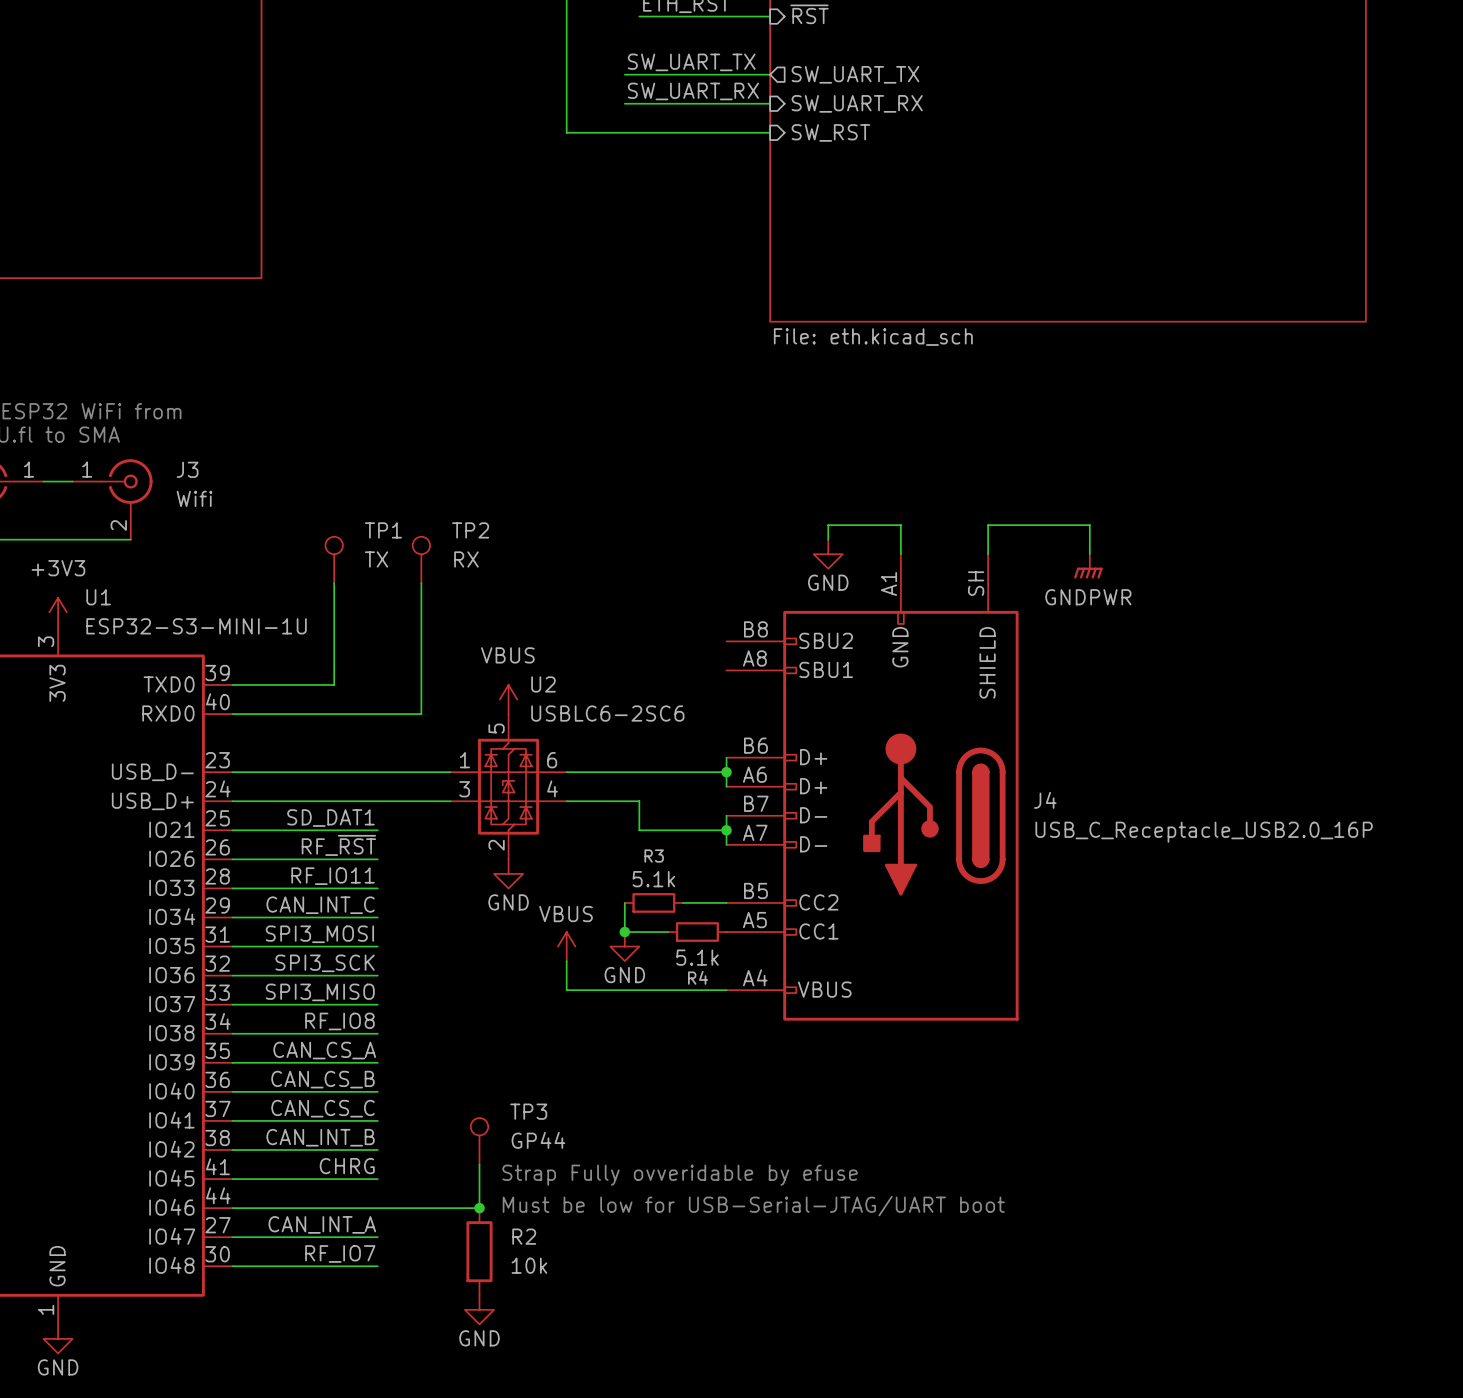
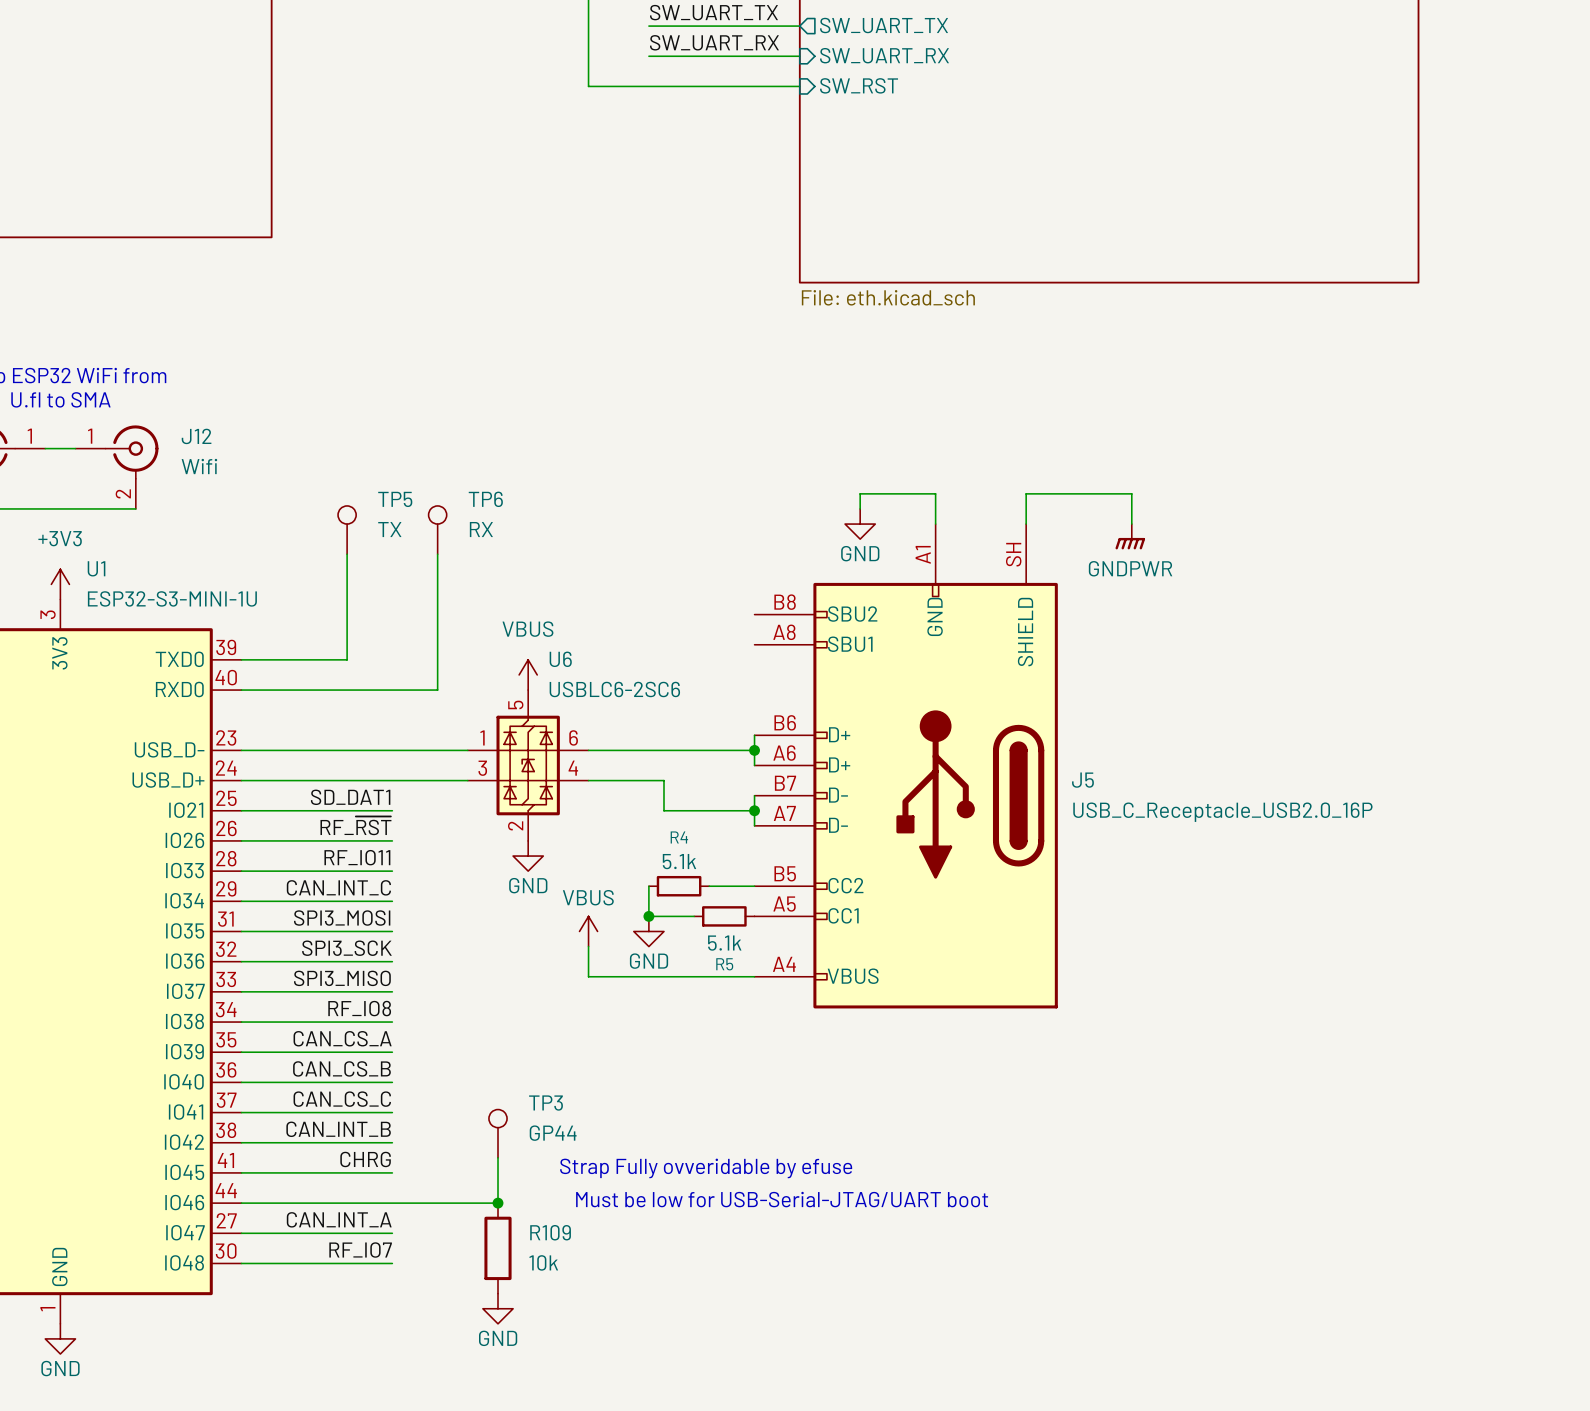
J3 name: J3 (187, 469) -> J12 (196, 436)
TP1 name: TP1 (383, 530) -> TP5 (395, 499)
TP2 name: TP2 (470, 530) -> TP6 (485, 499)
U2 name: U2 (543, 684) -> U6 (560, 659)
J4 name: J4 (1045, 800) -> J5 (1082, 780)
R3 name: R3 (654, 856) -> R4 (679, 837)
R4 name: R4 (698, 977) -> R5 (724, 964)
R2 name: R2 (524, 1236) -> R109 (550, 1232)

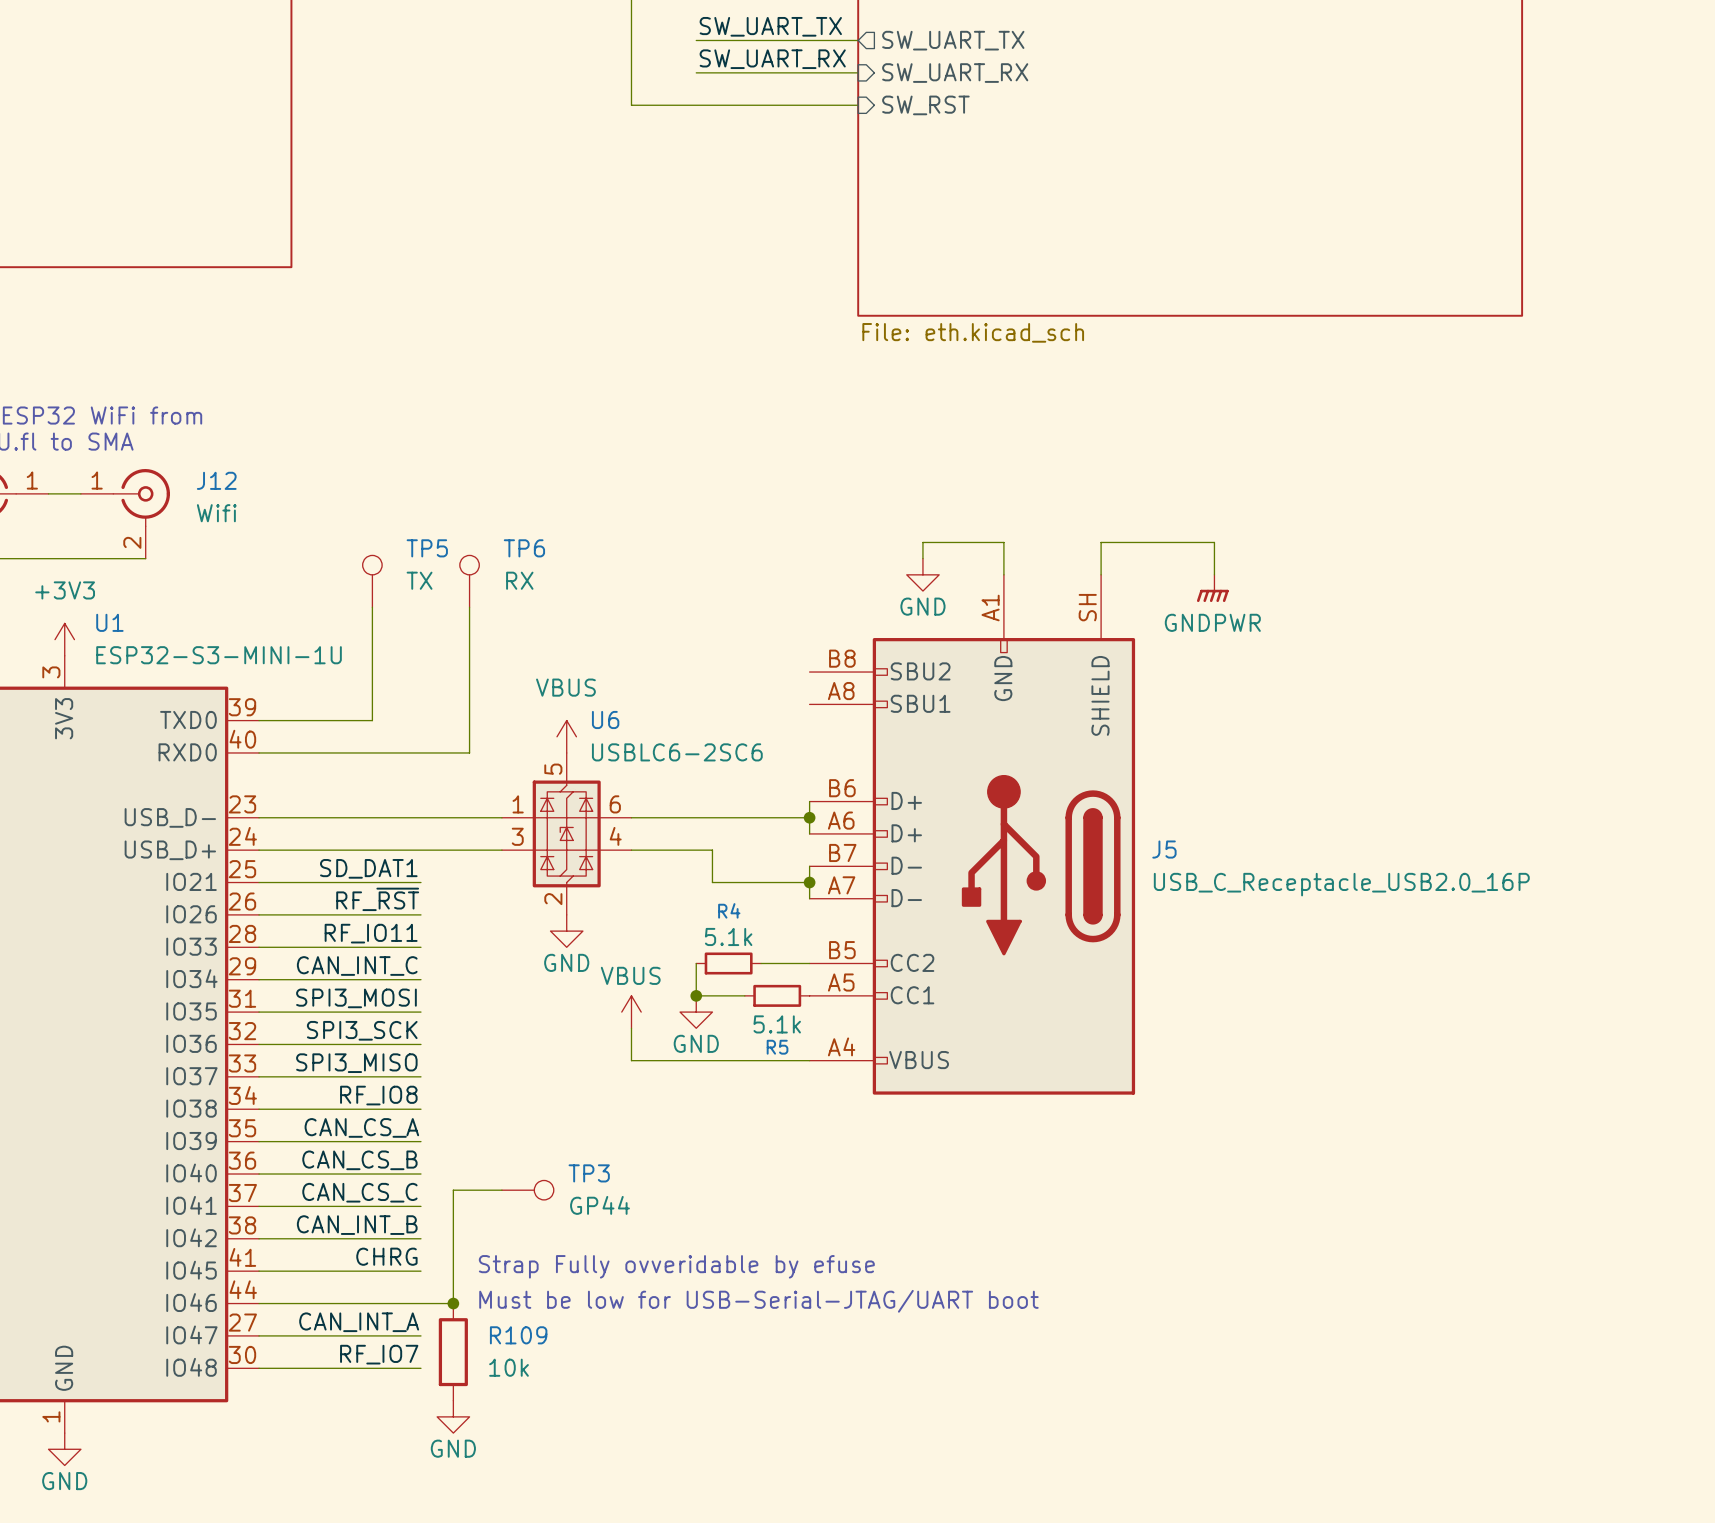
TP3 rotation: 0° (498, 1118) -> 90° clockwise (544, 1190)
TP3 position: (498, 1133) -> (527, 1190)
wire: (498, 1157) (498, 1203) (422, 1203) -> (501, 1190) (453, 1190) (453, 1303)
text position: Strap Fully ovveridable by efuse (706, 1168) -> Strap Fully ovveridable by efuse (676, 1266)
text position: Must be low for USB-Serial-JTAG/UART boot (782, 1199) -> Must be low for USB-Serial-JTAG/UART boot (758, 1301)
junction: none -> (453, 1303)
junction: (498, 1203) -> none
R109 position: (498, 1248) -> (453, 1352)
power symbol position: GND (498, 1308) -> GND (453, 1416)

